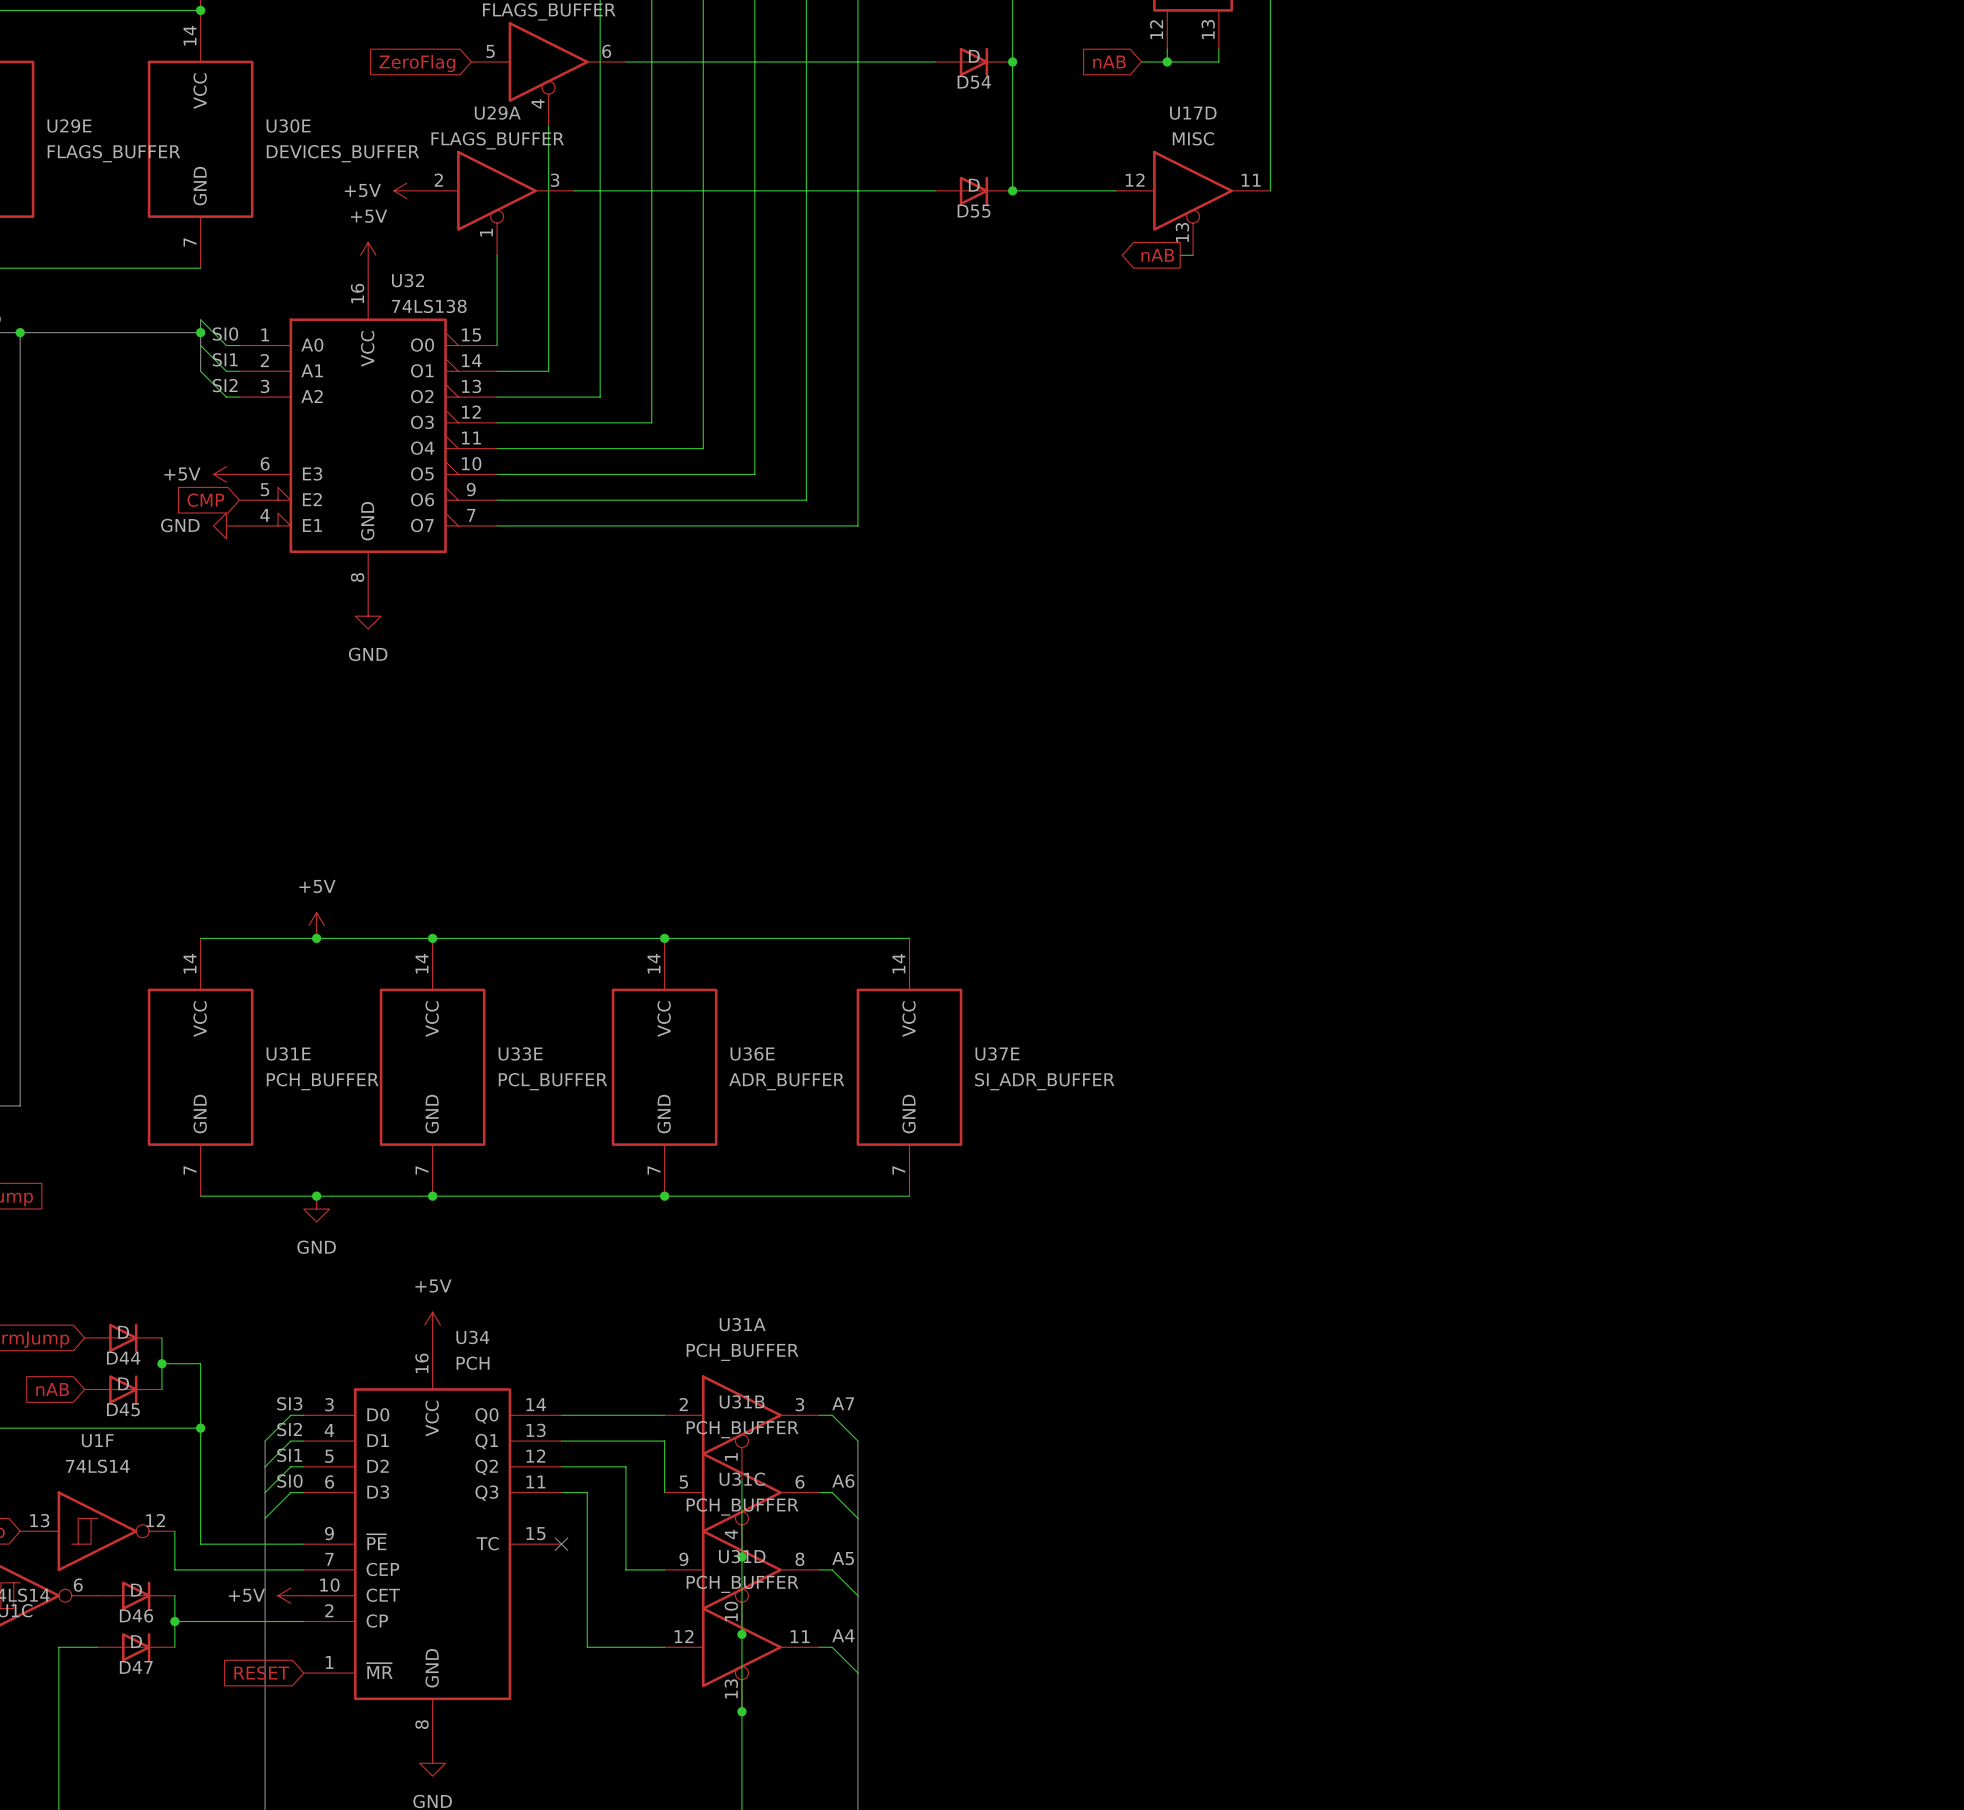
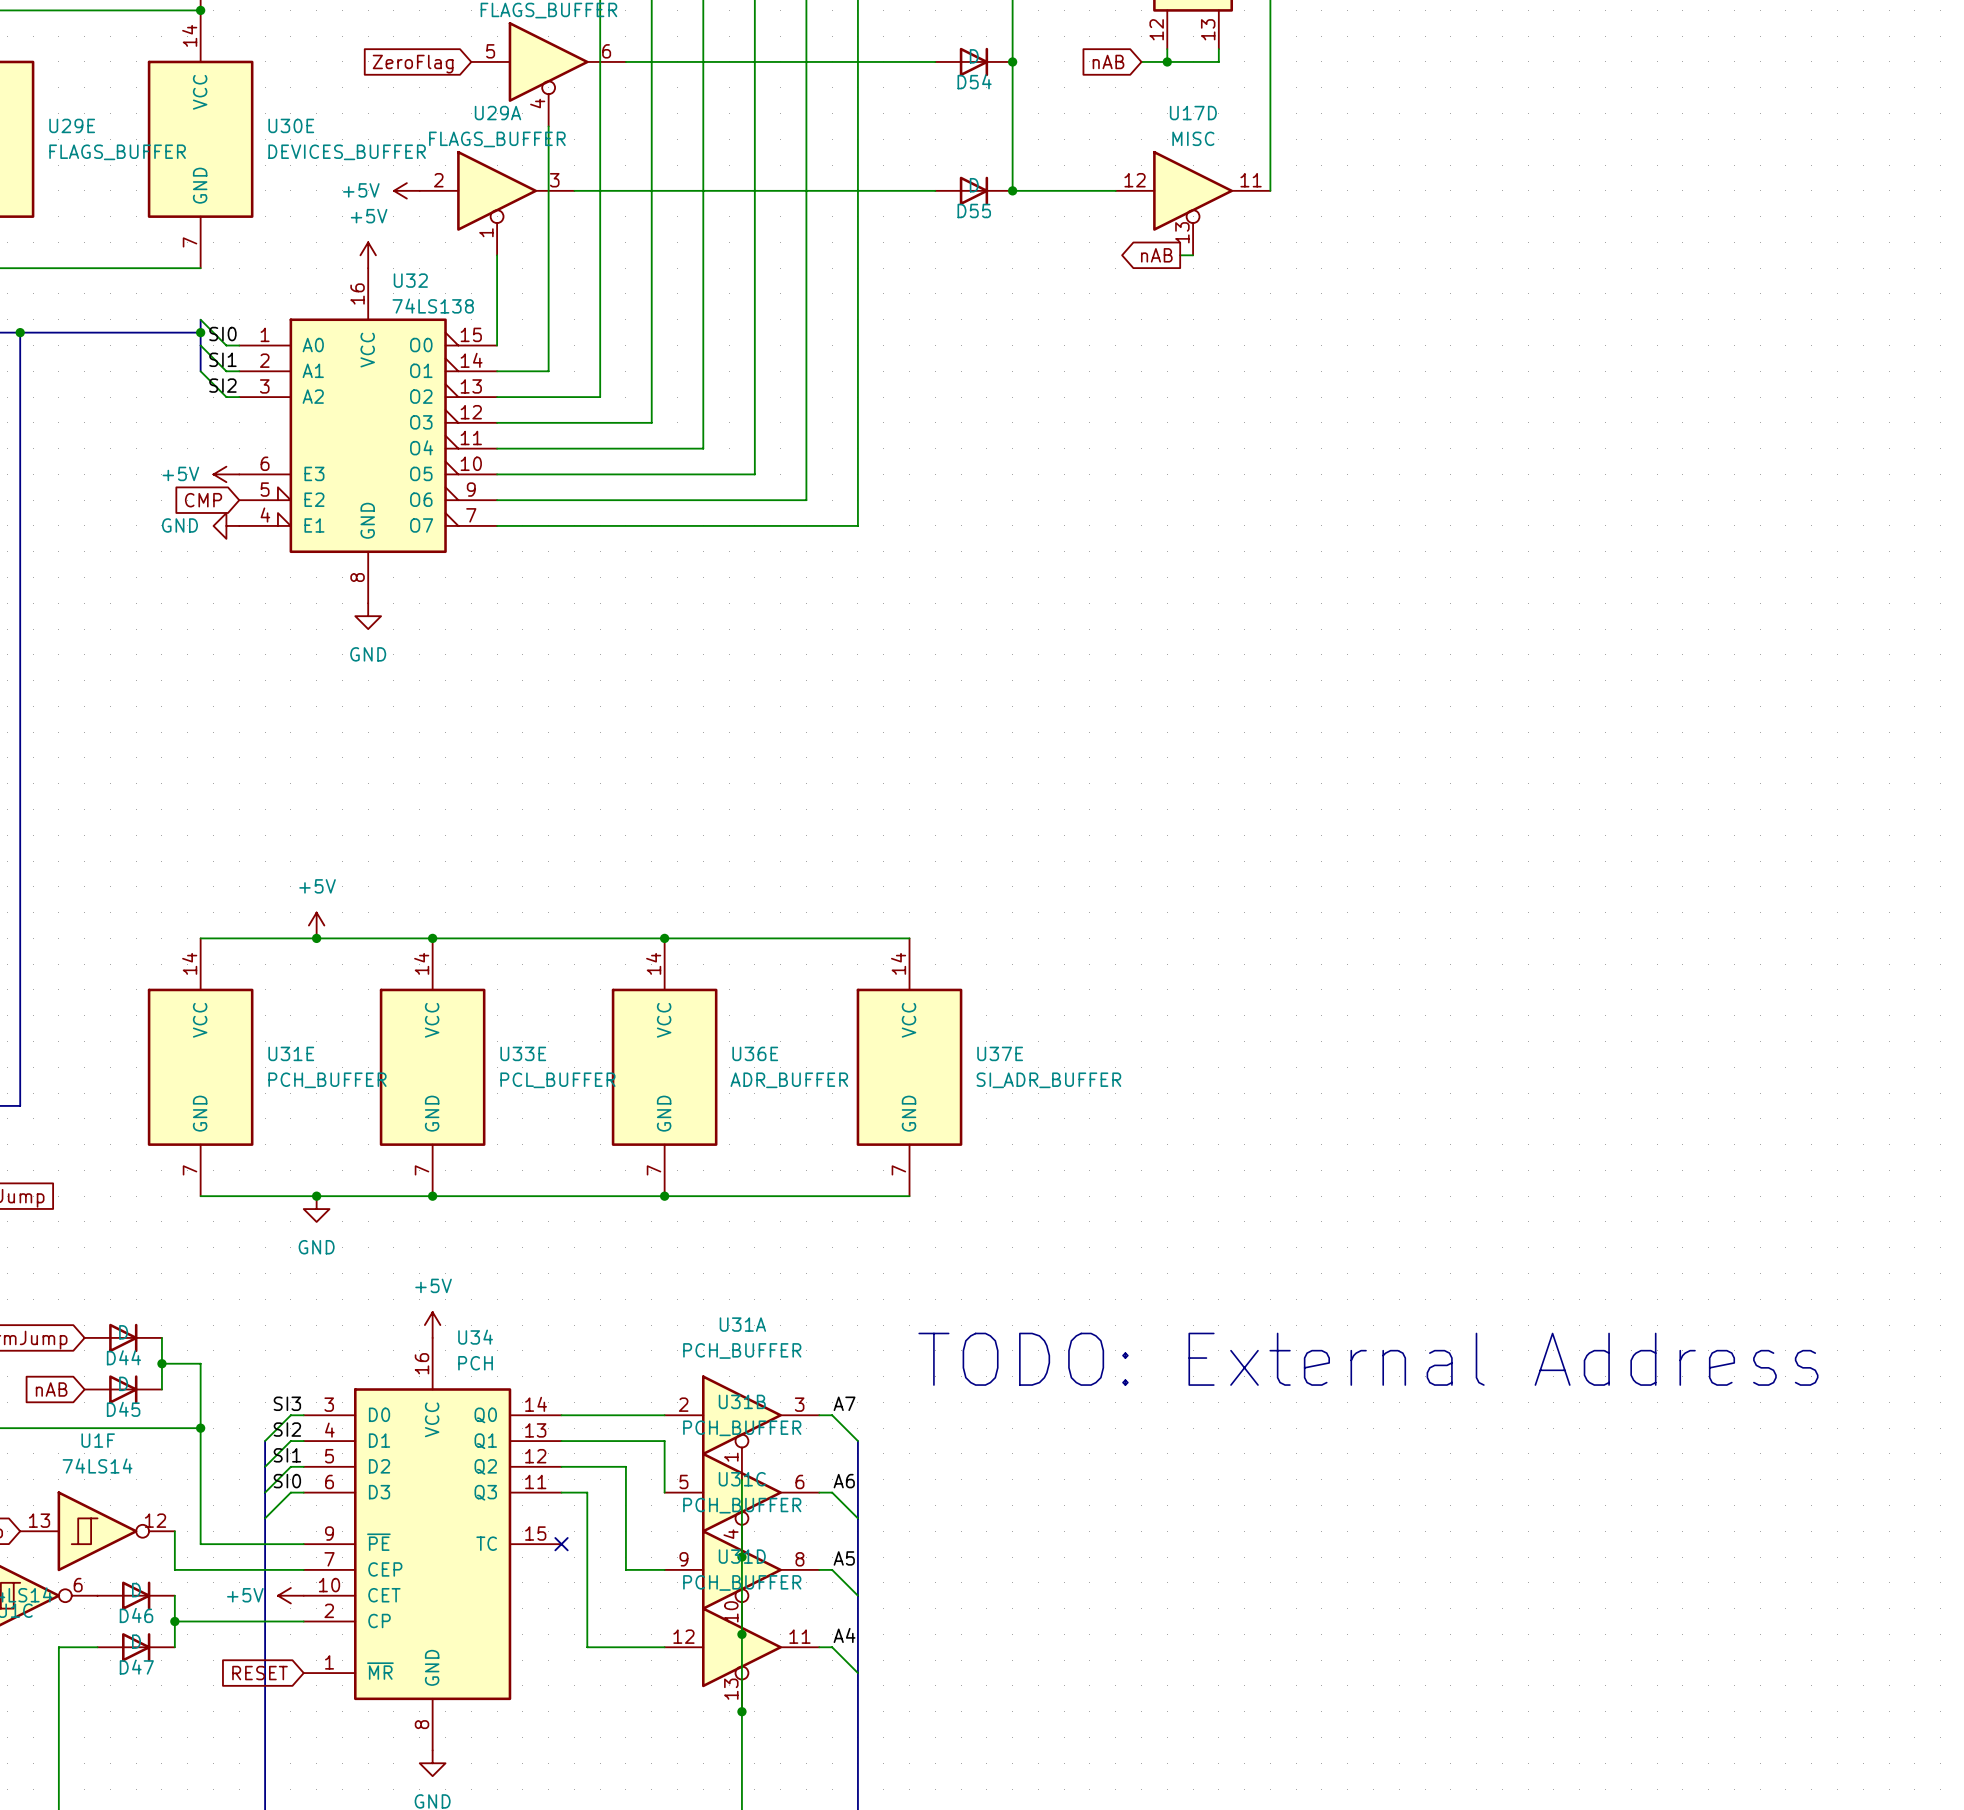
text: none -> TODO: External Address (1368, 1359)

